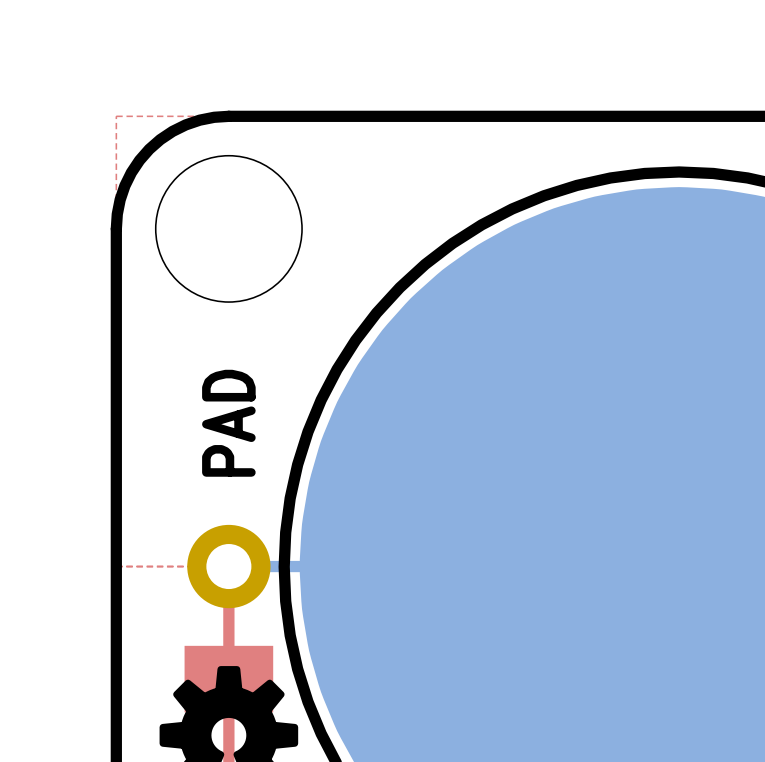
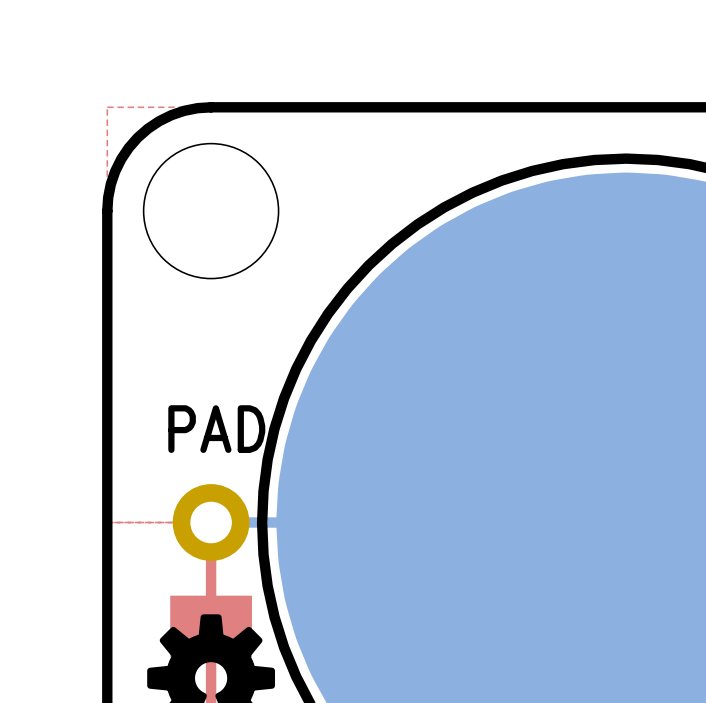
text rotation: 0° (228, 423) -> 90° clockwise (216, 429)

